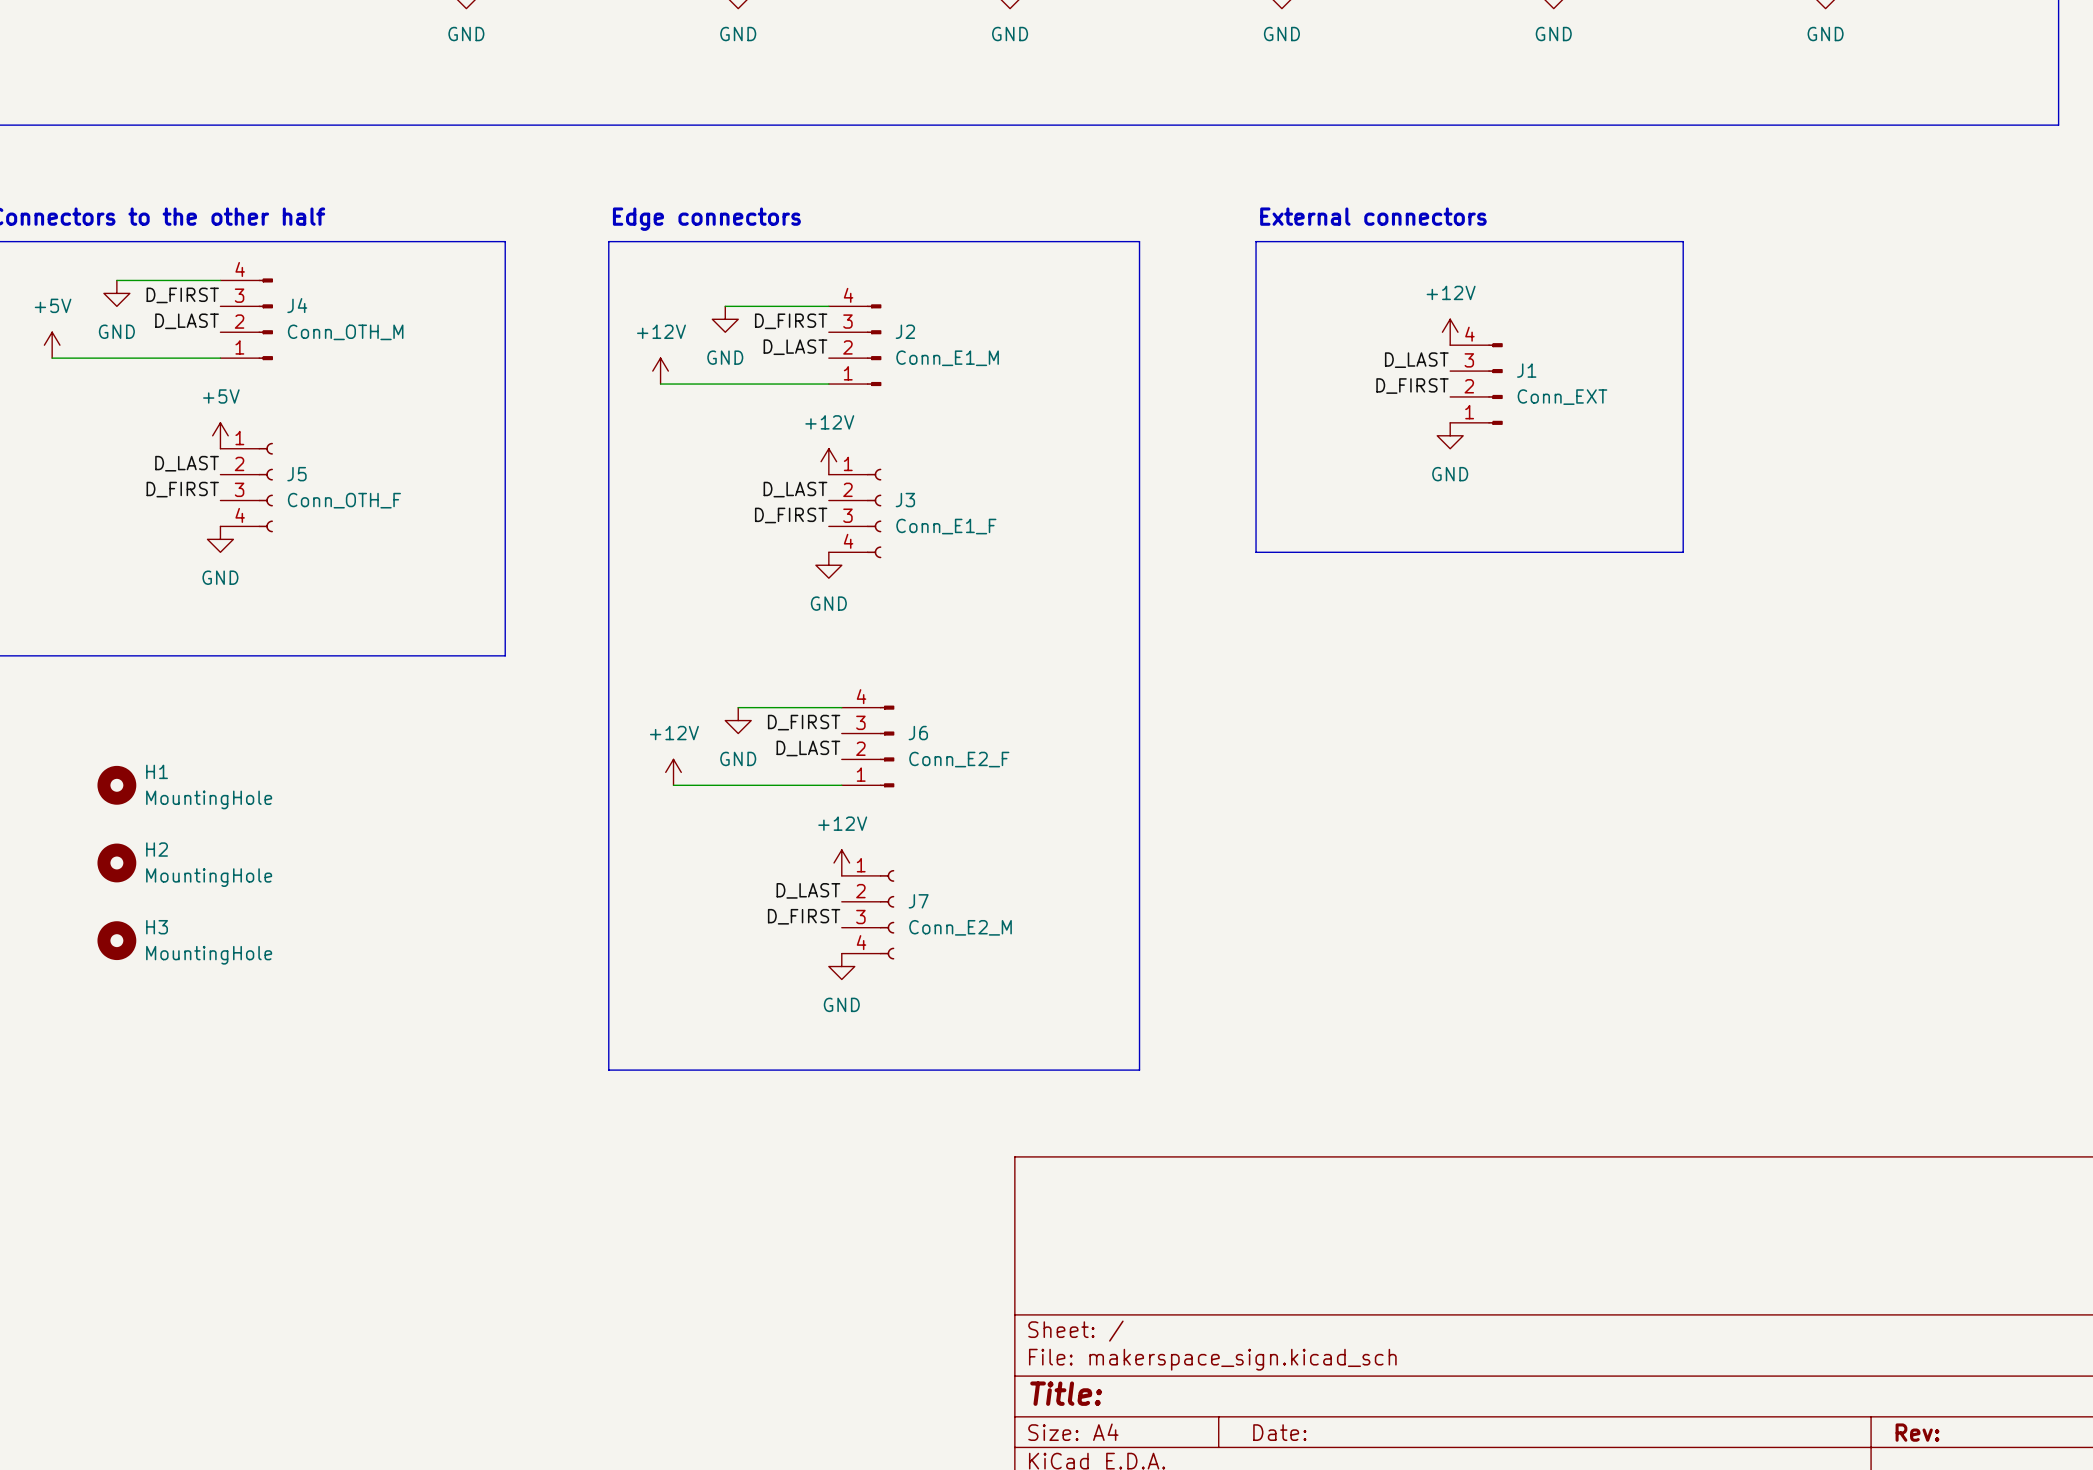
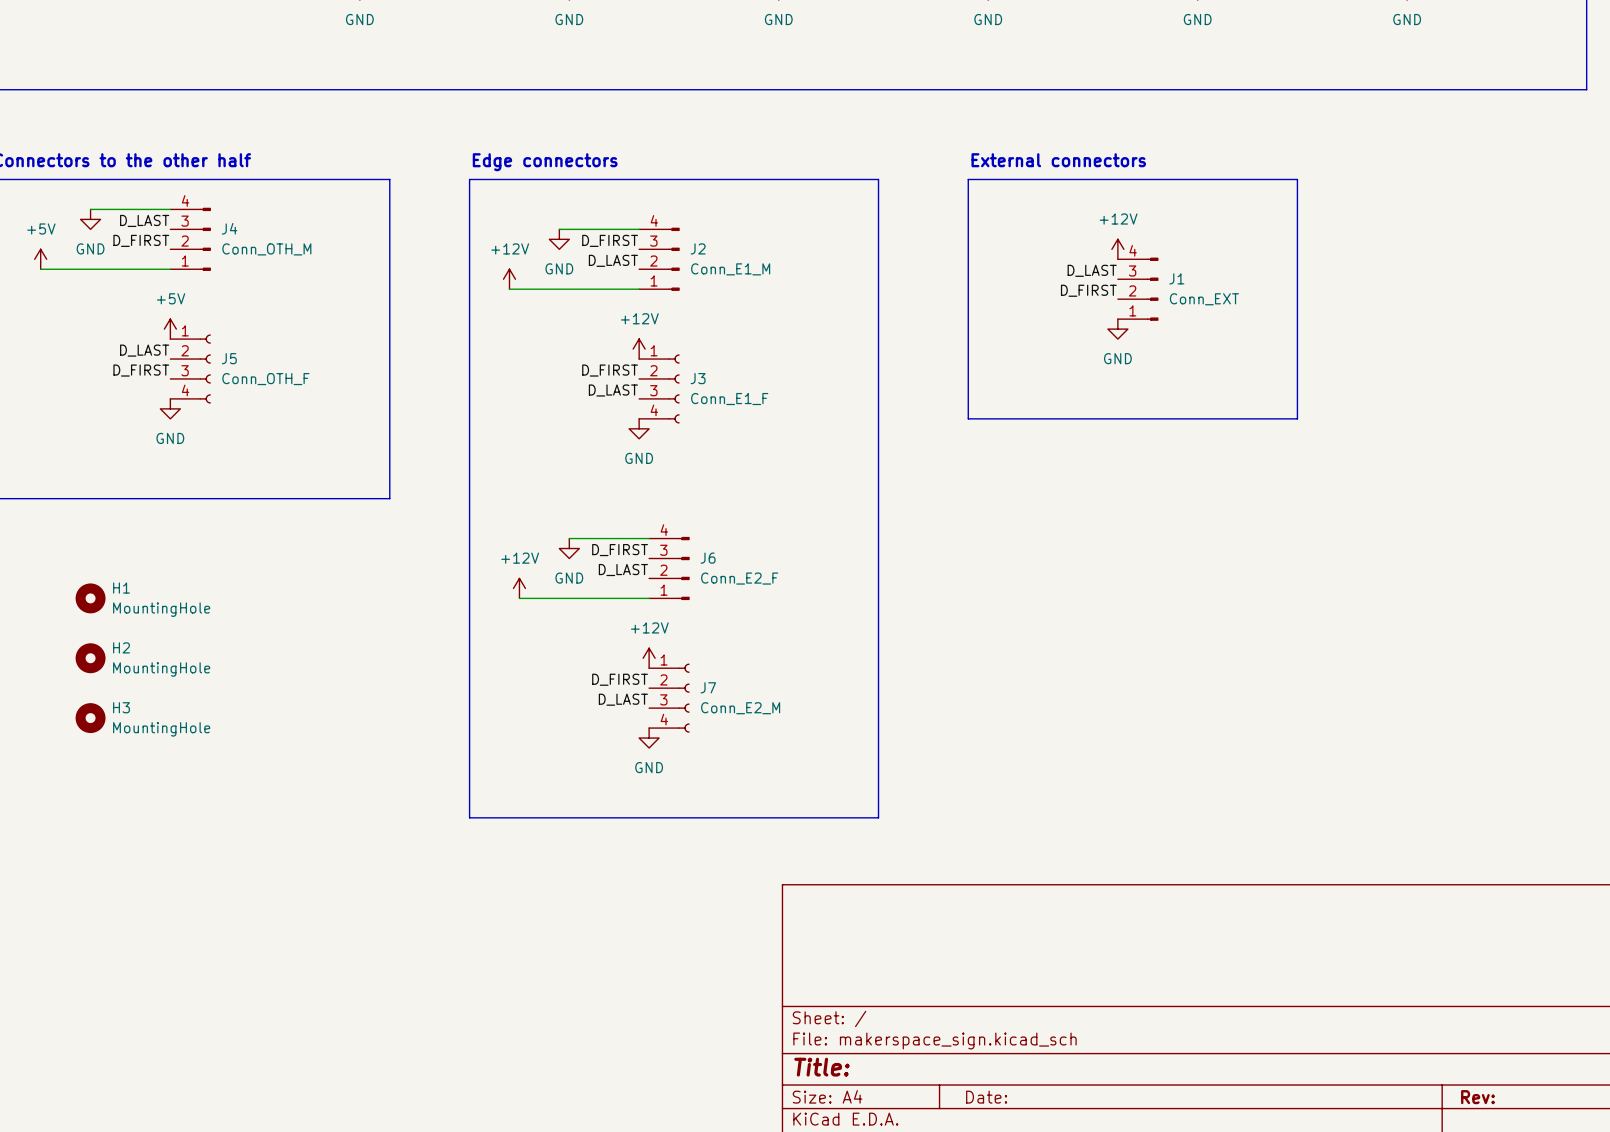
label: D_FIRST (182, 295) -> D_LAST (144, 220)
label: D_LAST (187, 321) -> D_FIRST (141, 240)
label: D_LAST (795, 489) -> D_FIRST (610, 370)
label: D_FIRST (791, 515) -> D_LAST (613, 390)
label: D_LAST (808, 890) -> D_FIRST (620, 679)
label: D_FIRST (804, 916) -> D_LAST (623, 699)

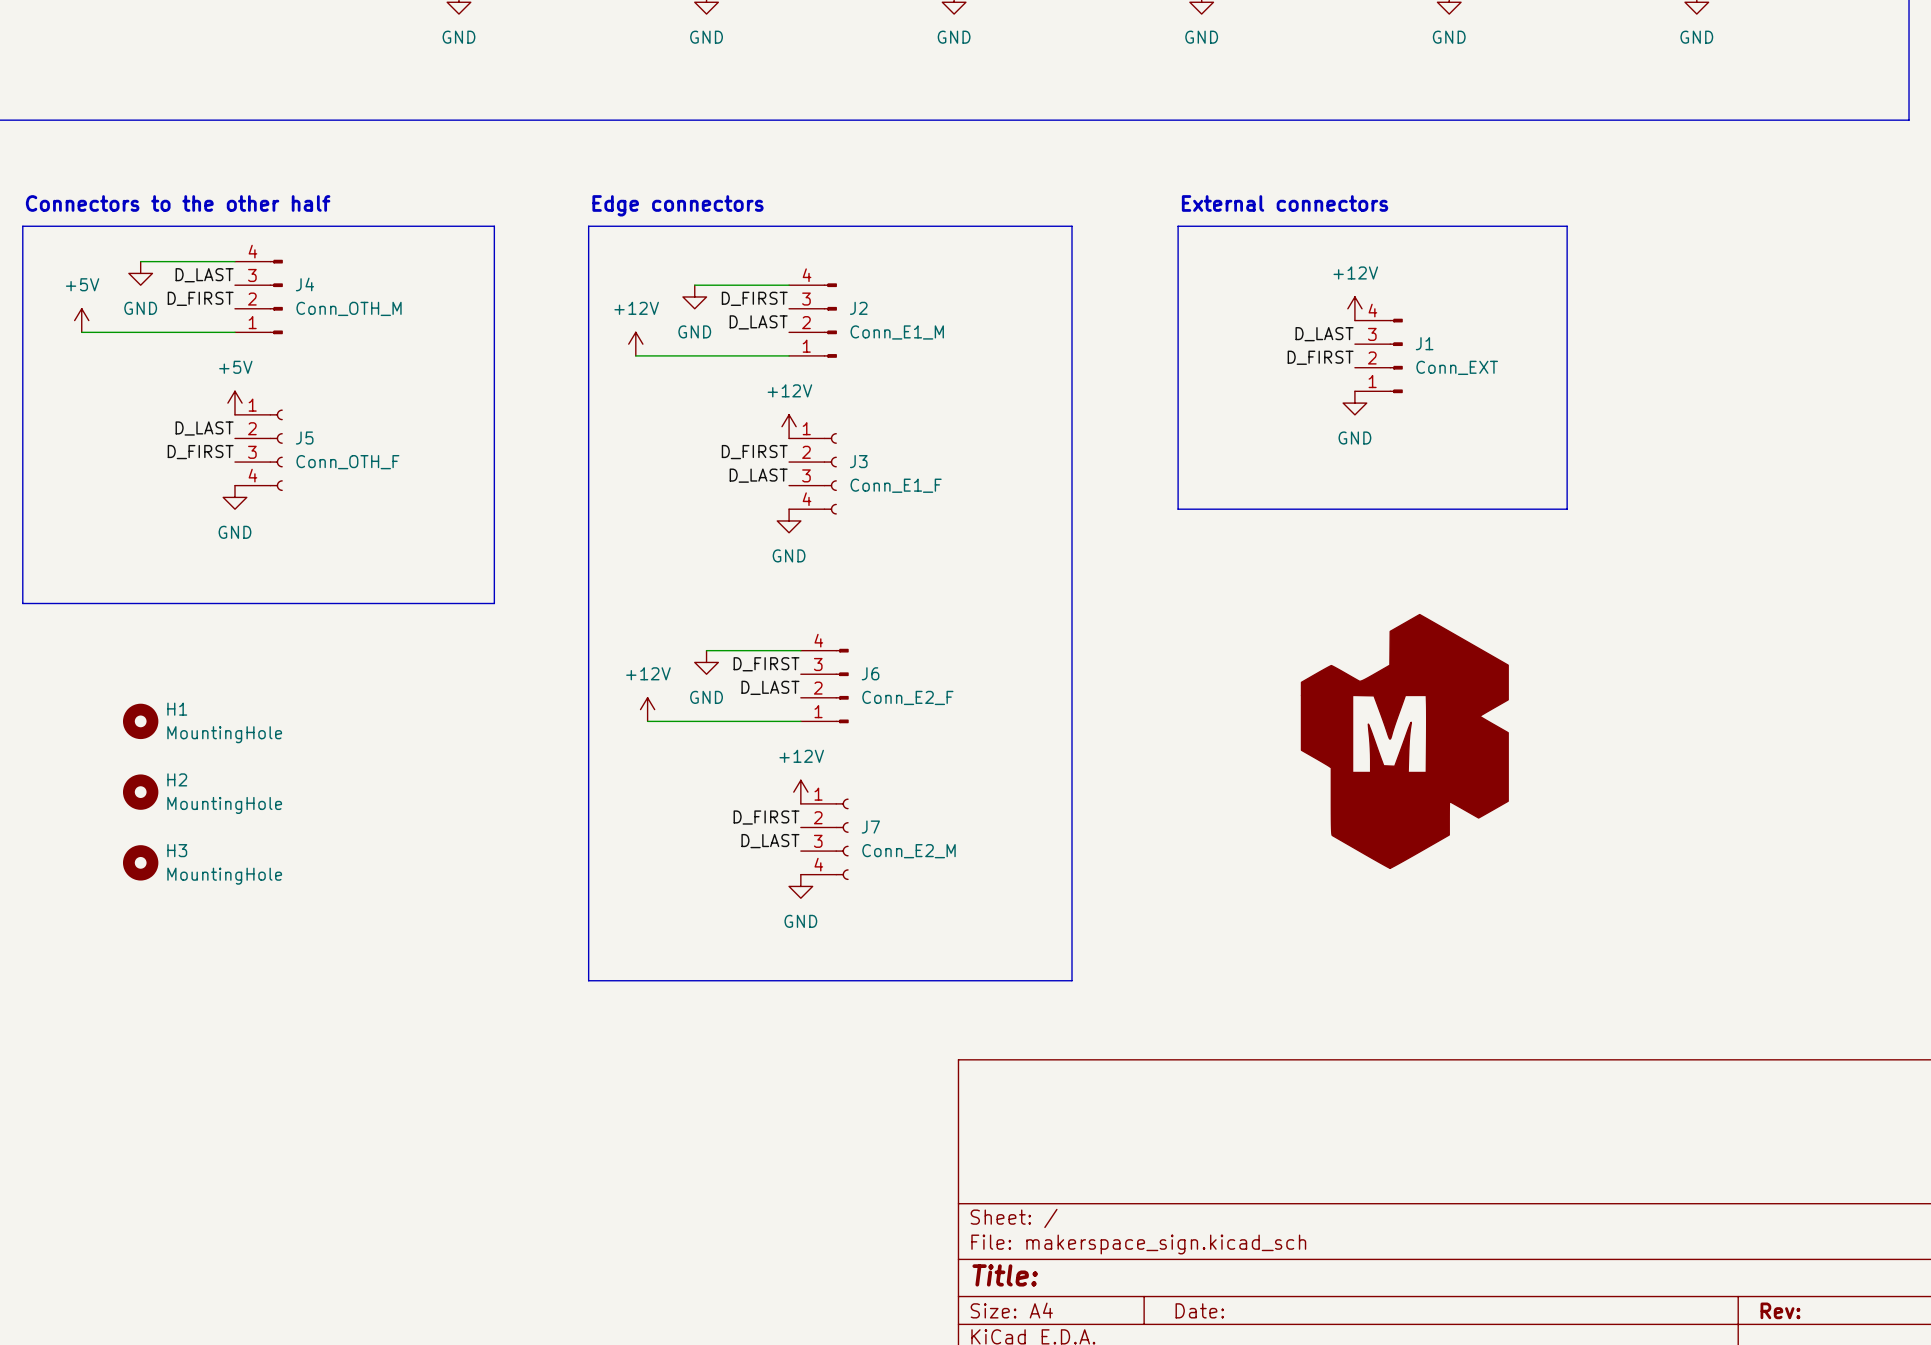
part: none -> (1404, 741)

